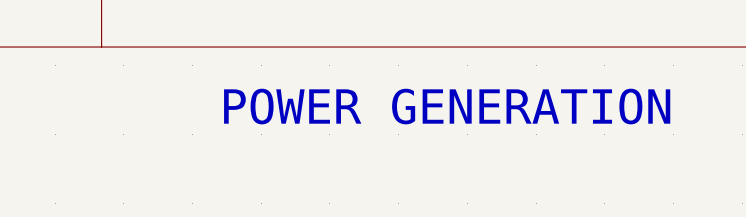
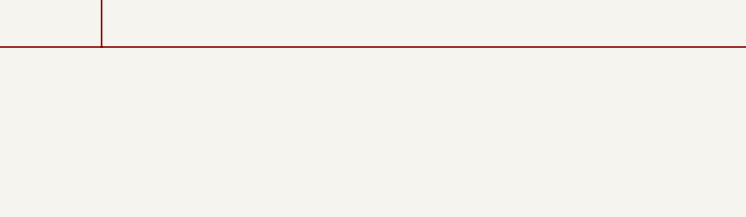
text: POWER GENERATION (447, 106) -> none

